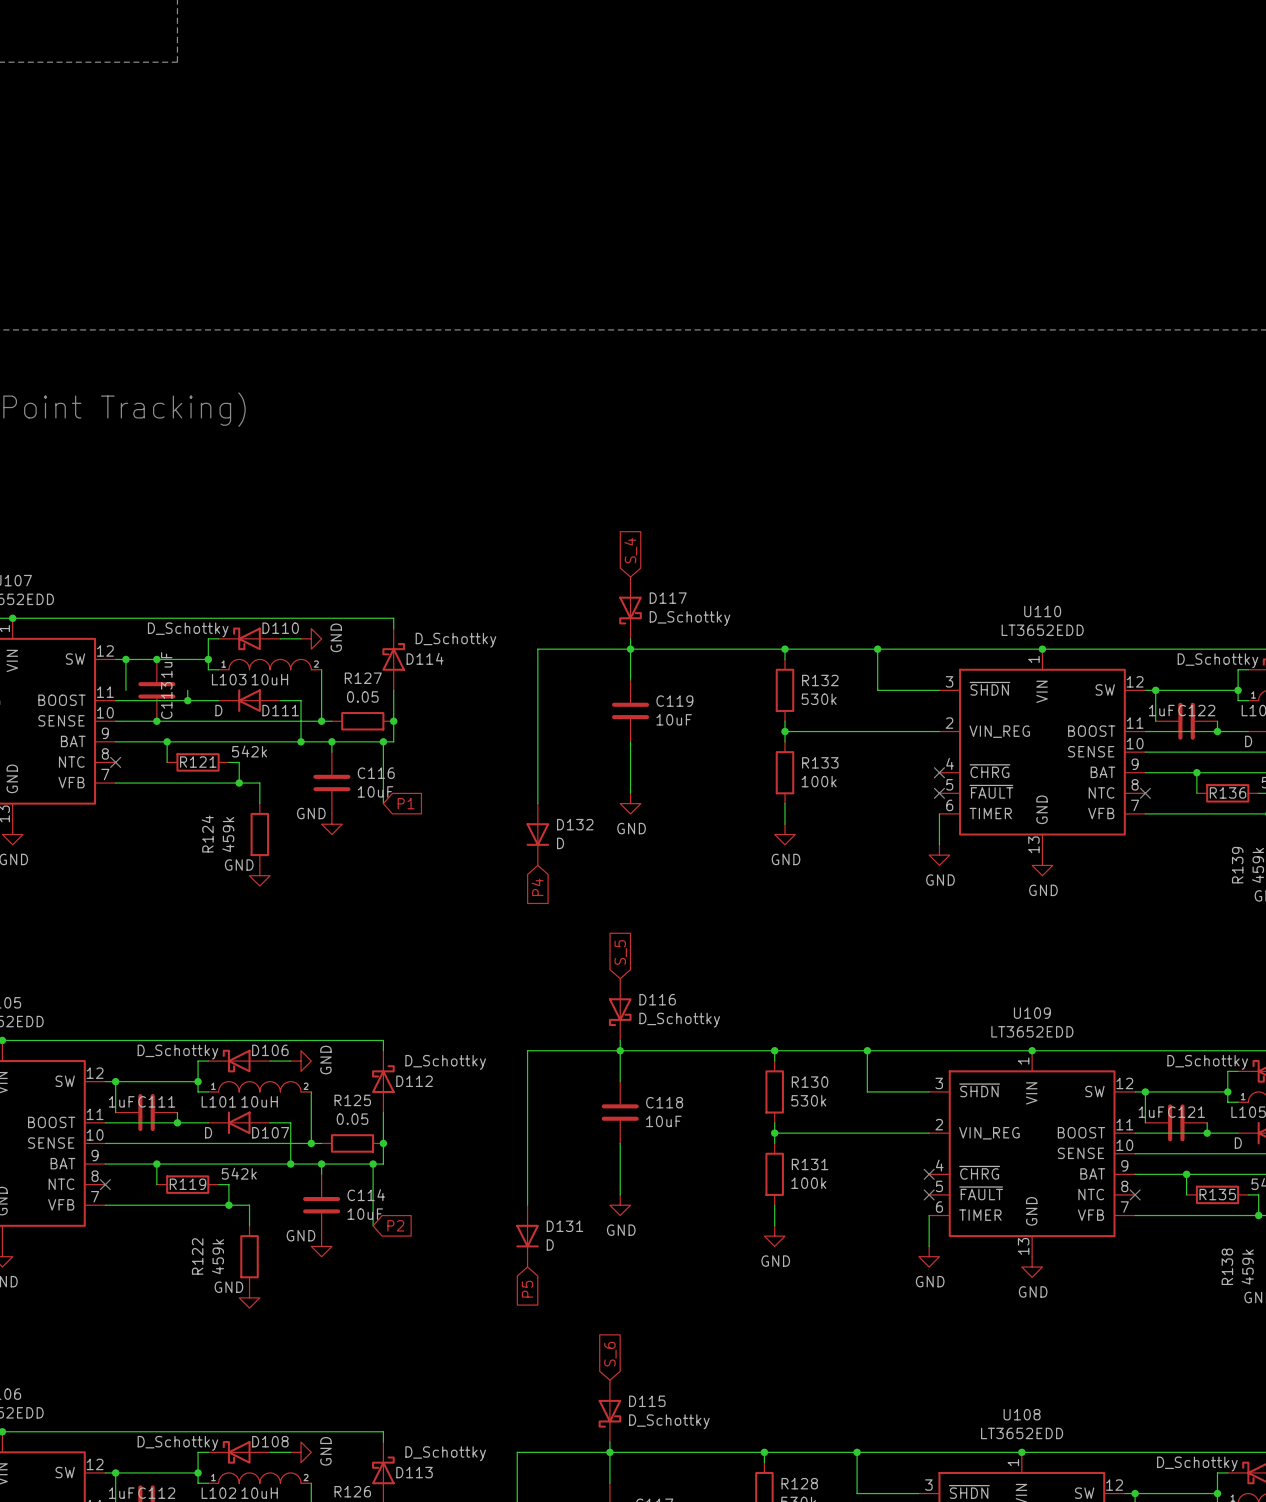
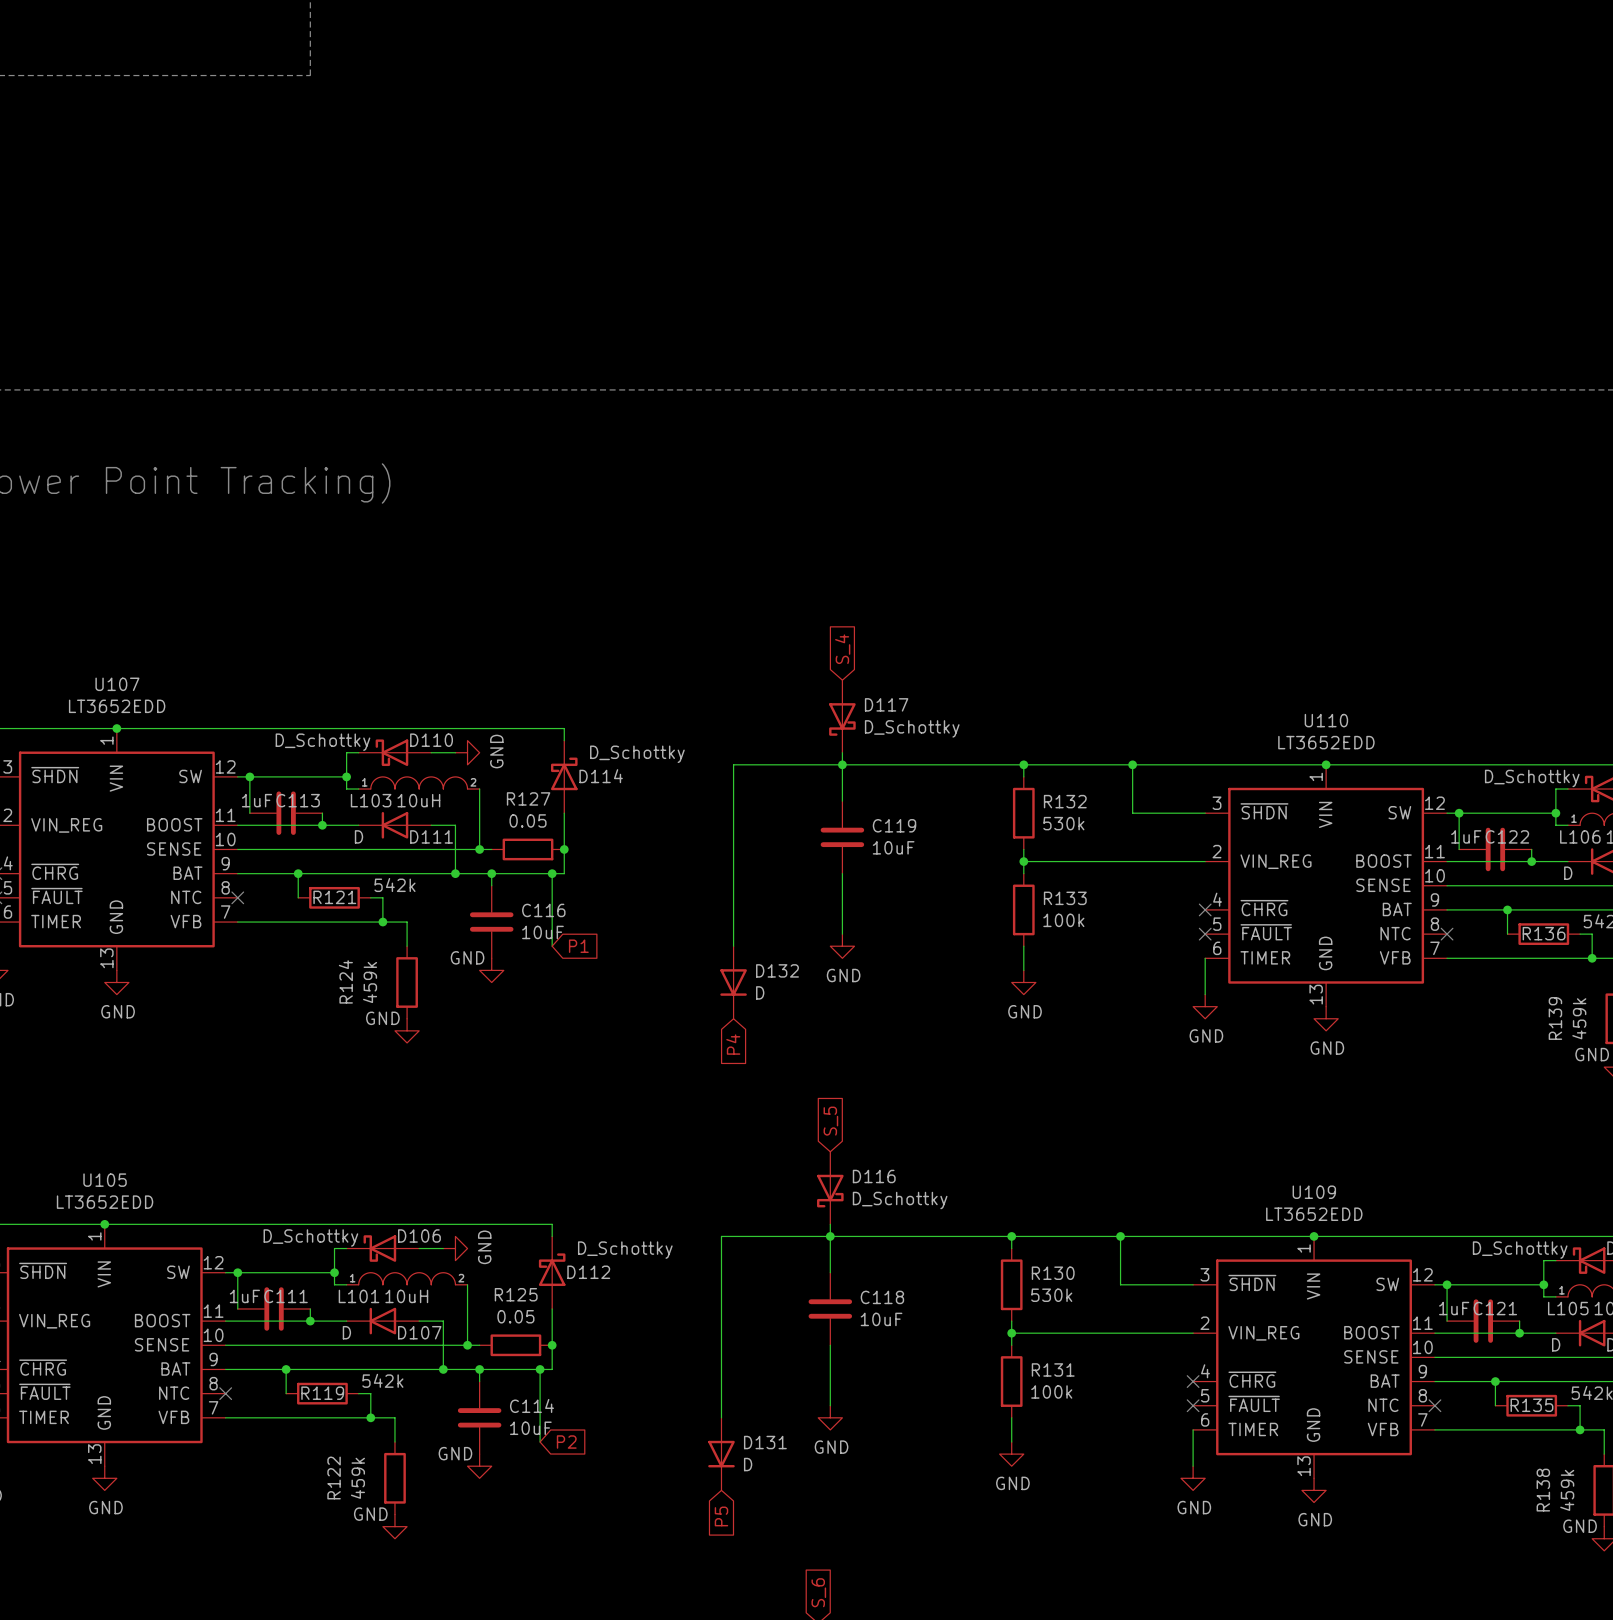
junction: (156, 659) -> none
C113 value position: 1uF (166, 665) -> 1uF (256, 800)
C113 rotation: 0° (156, 690) -> 90° clockwise (286, 813)
C113 name position: C113 (166, 700) -> C113 (298, 800)
junction: (156, 721) -> none

